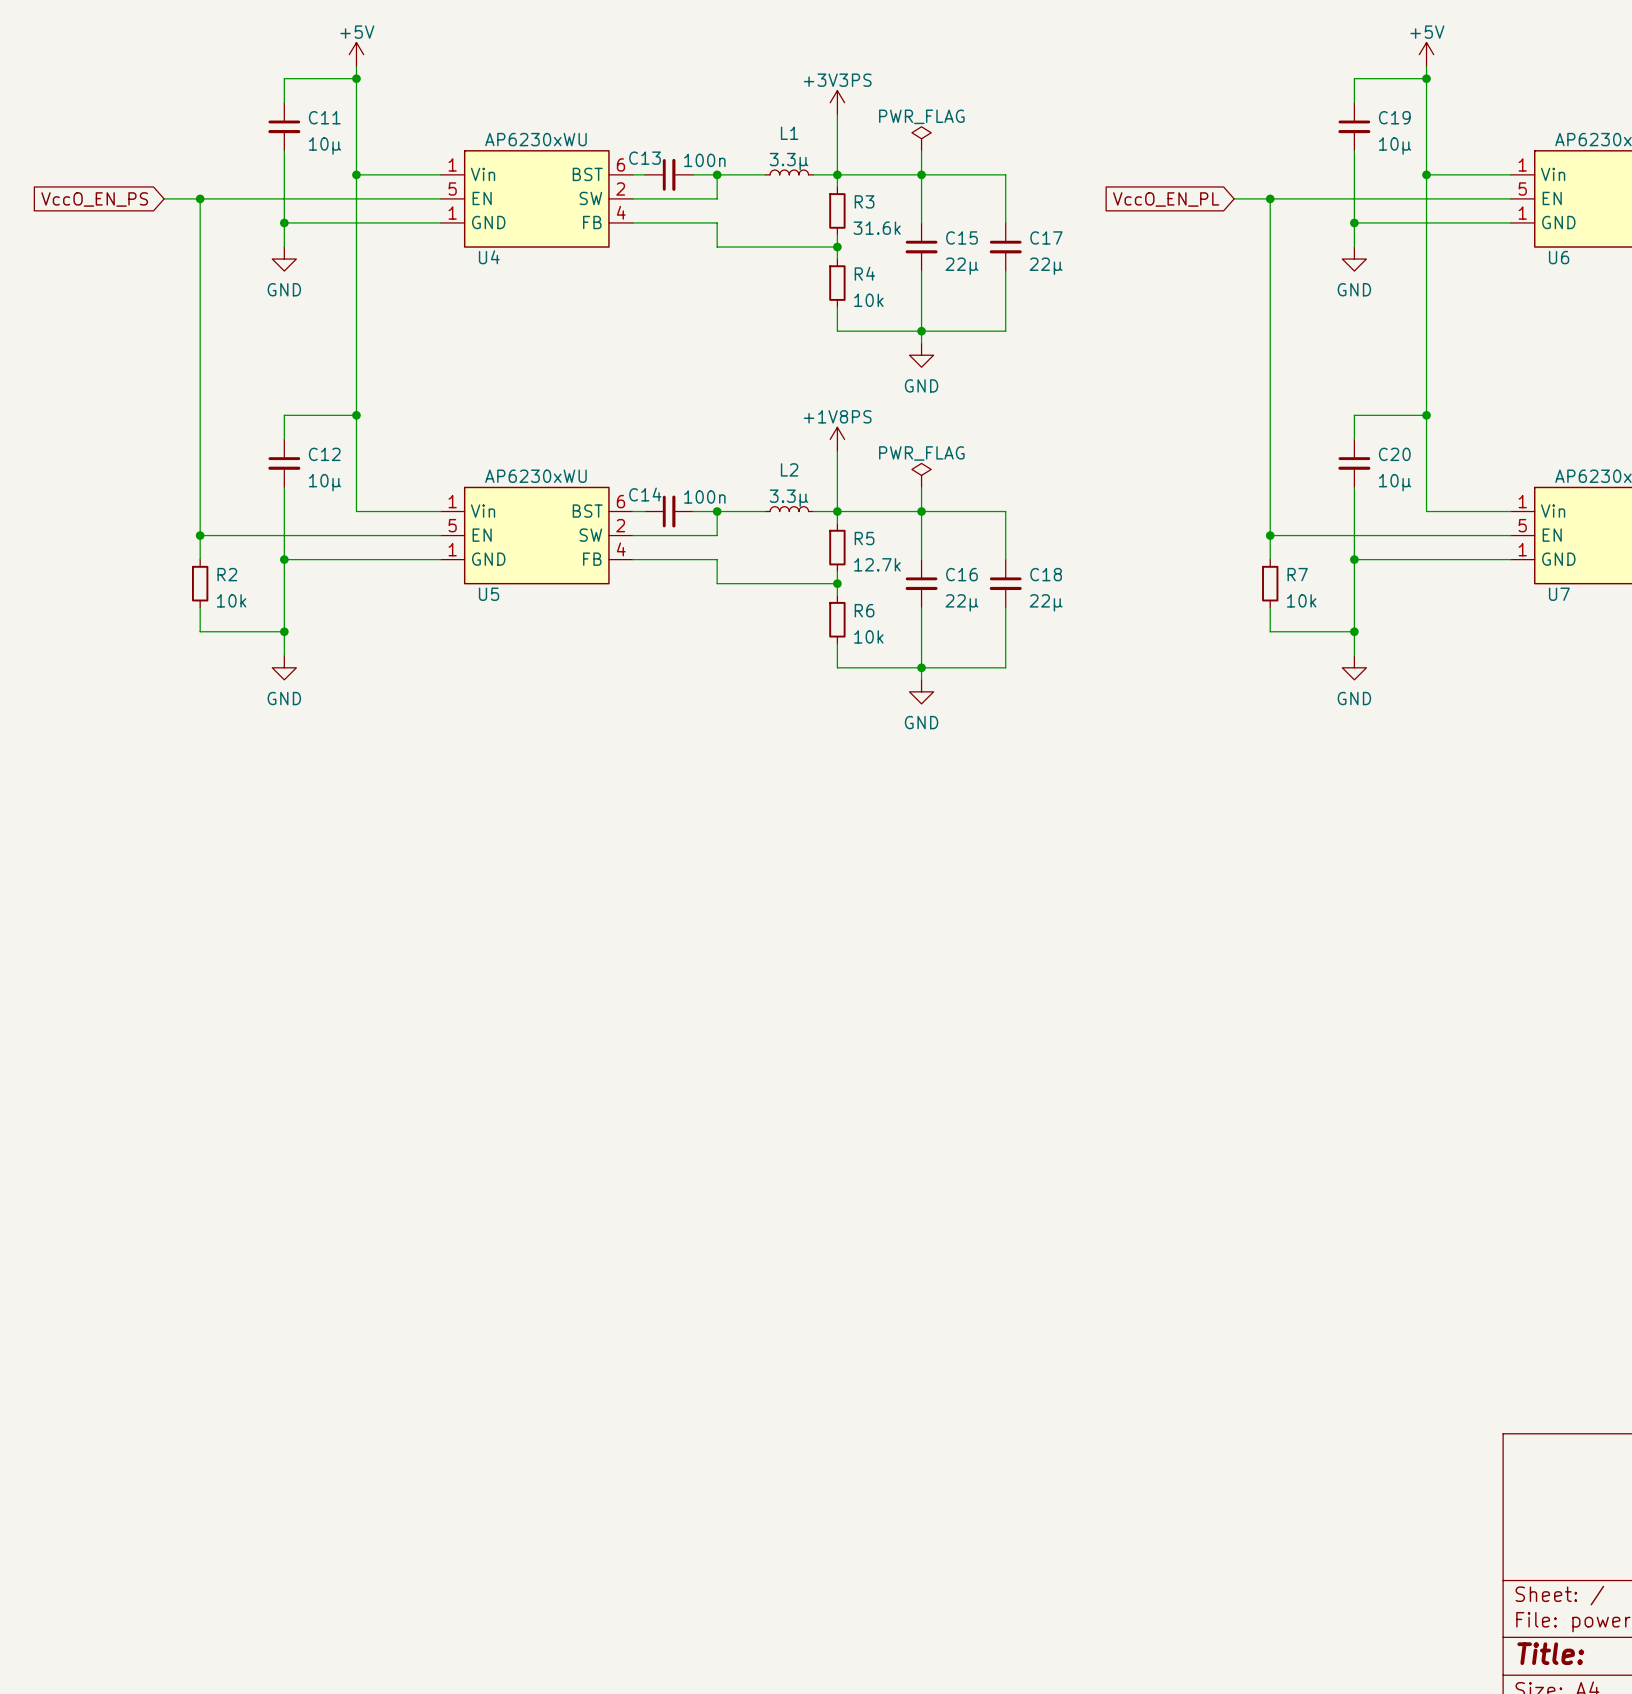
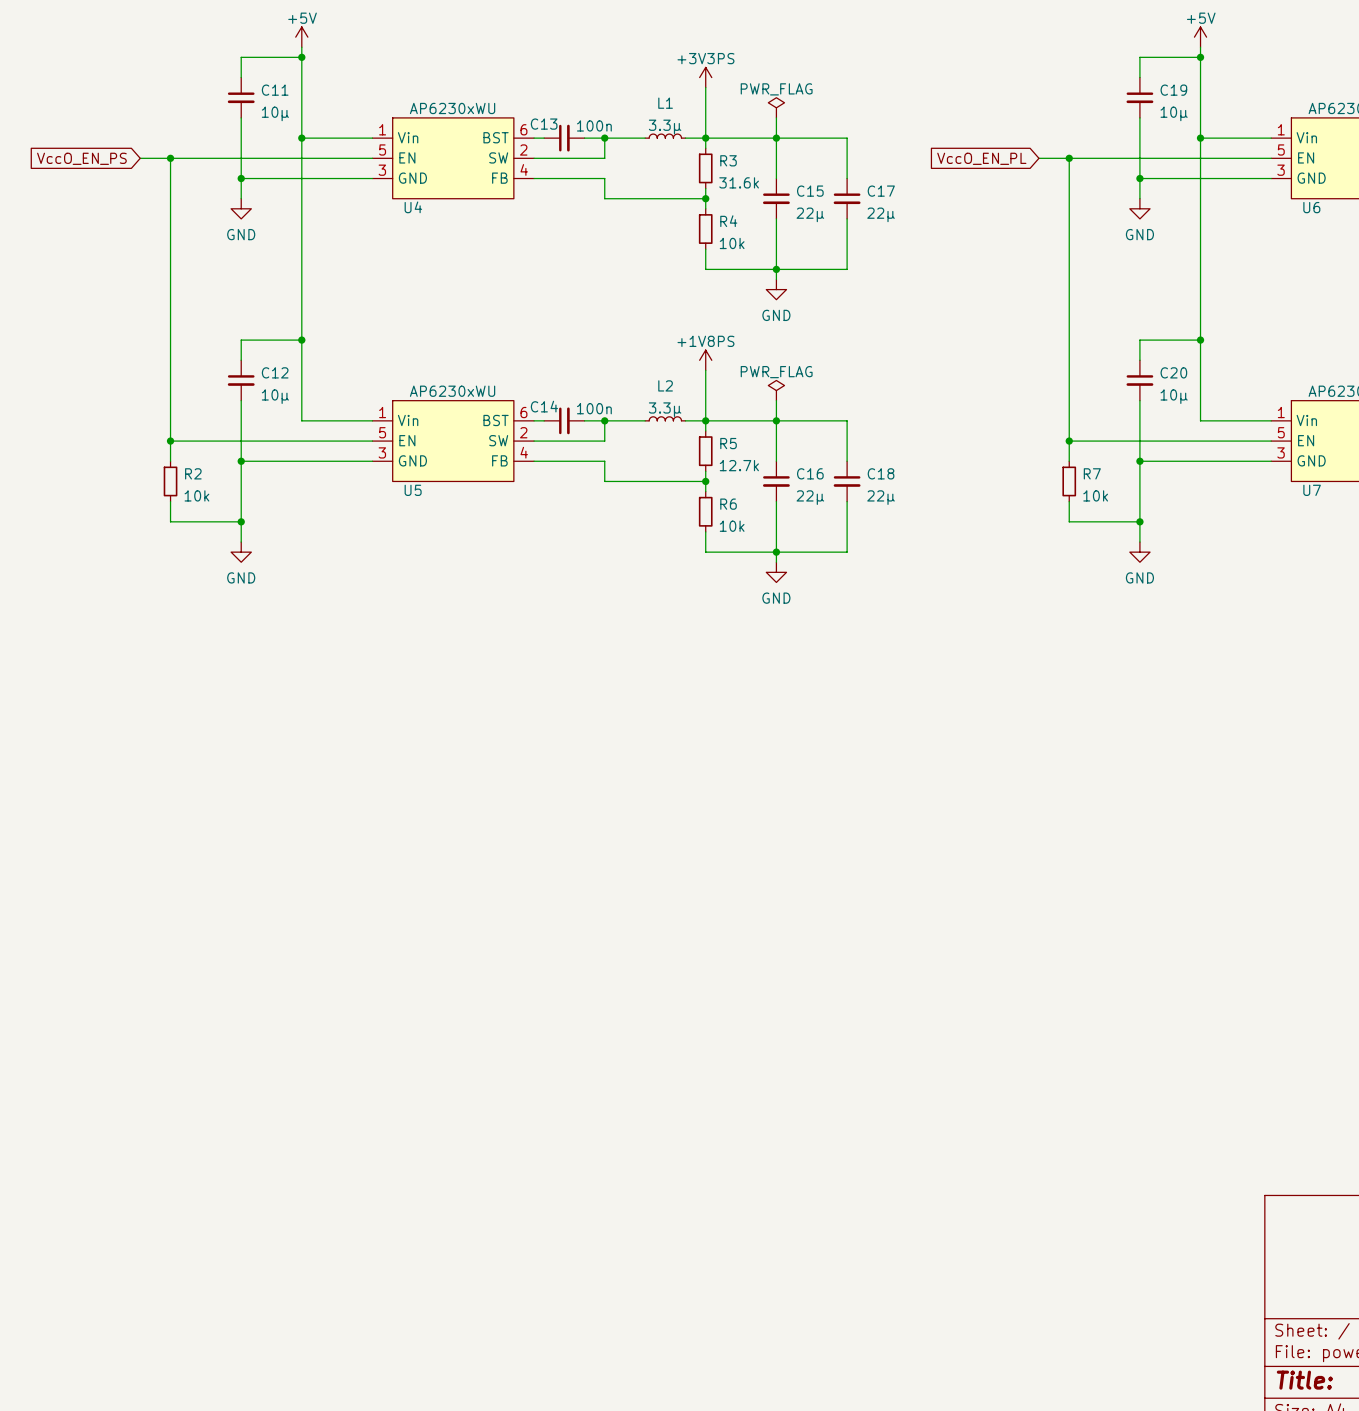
U4 pin number: 1 (452, 213) -> 3 (382, 170)
U6 pin number: 1 (1522, 213) -> 3 (1281, 170)
U5 pin number: 1 (452, 549) -> 3 (382, 452)
U7 pin number: 1 (1522, 549) -> 3 (1281, 452)

